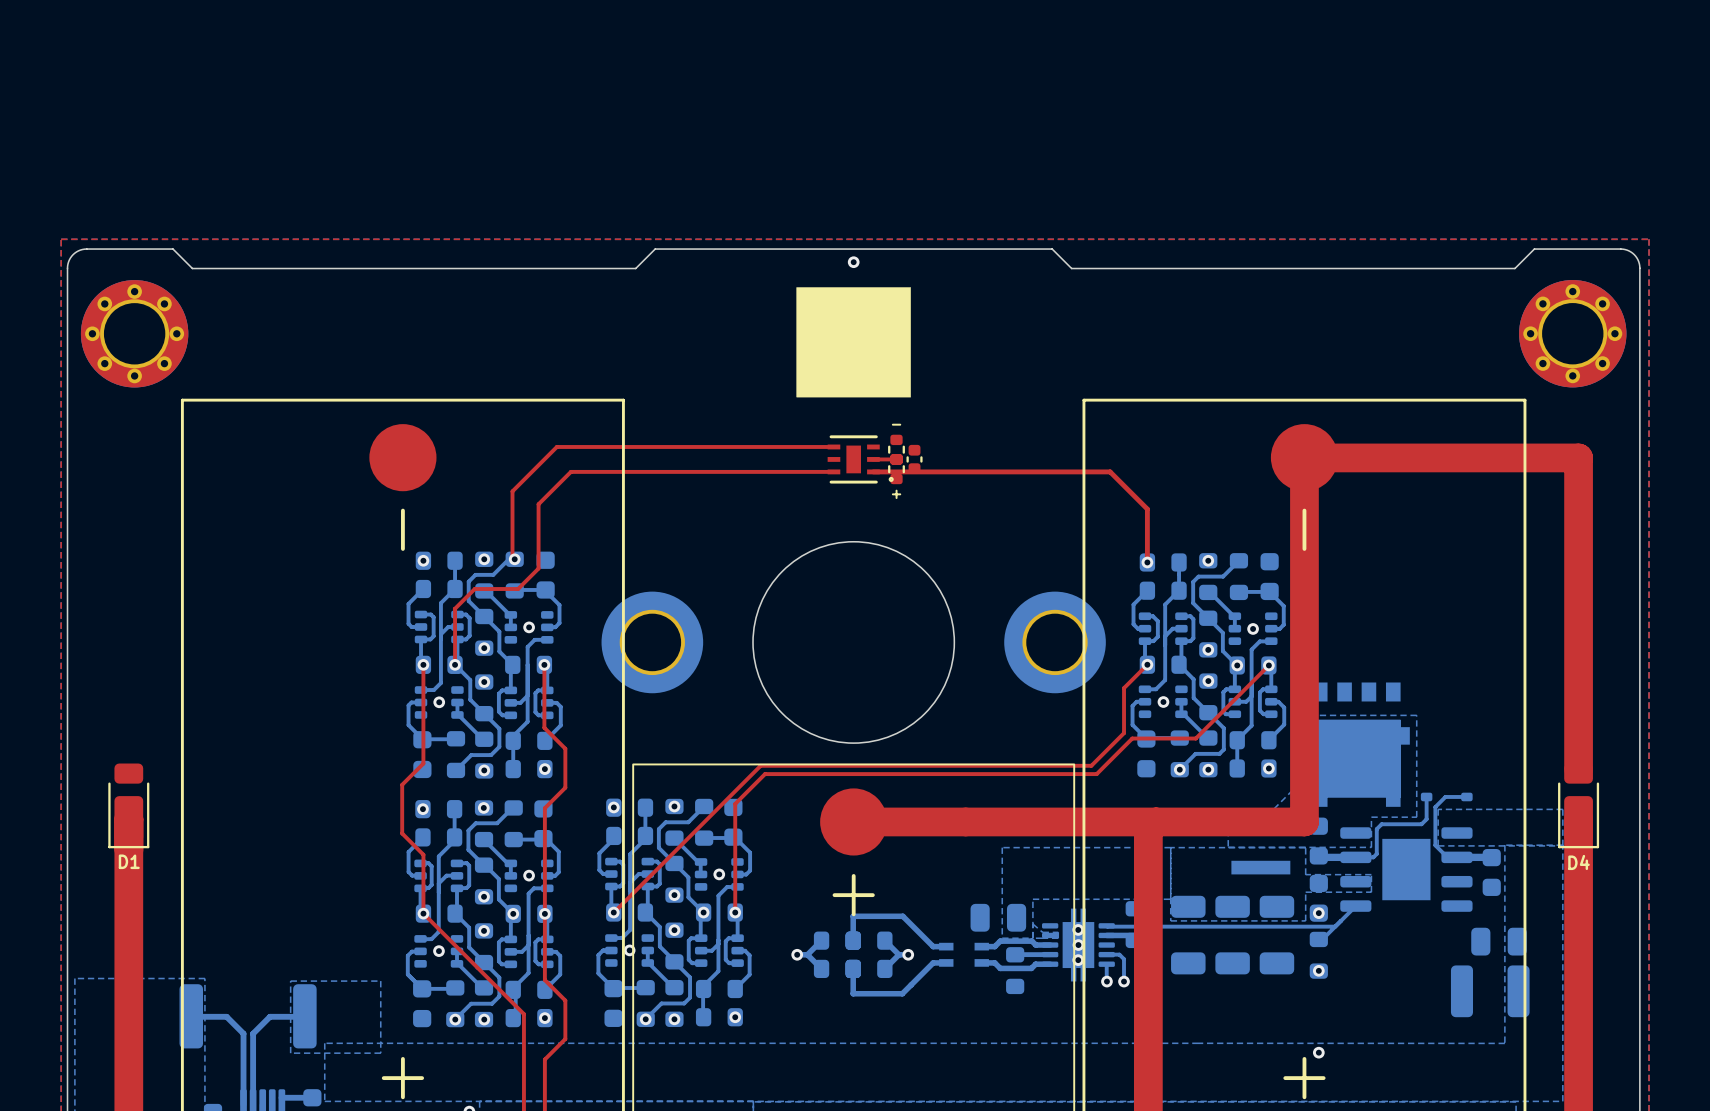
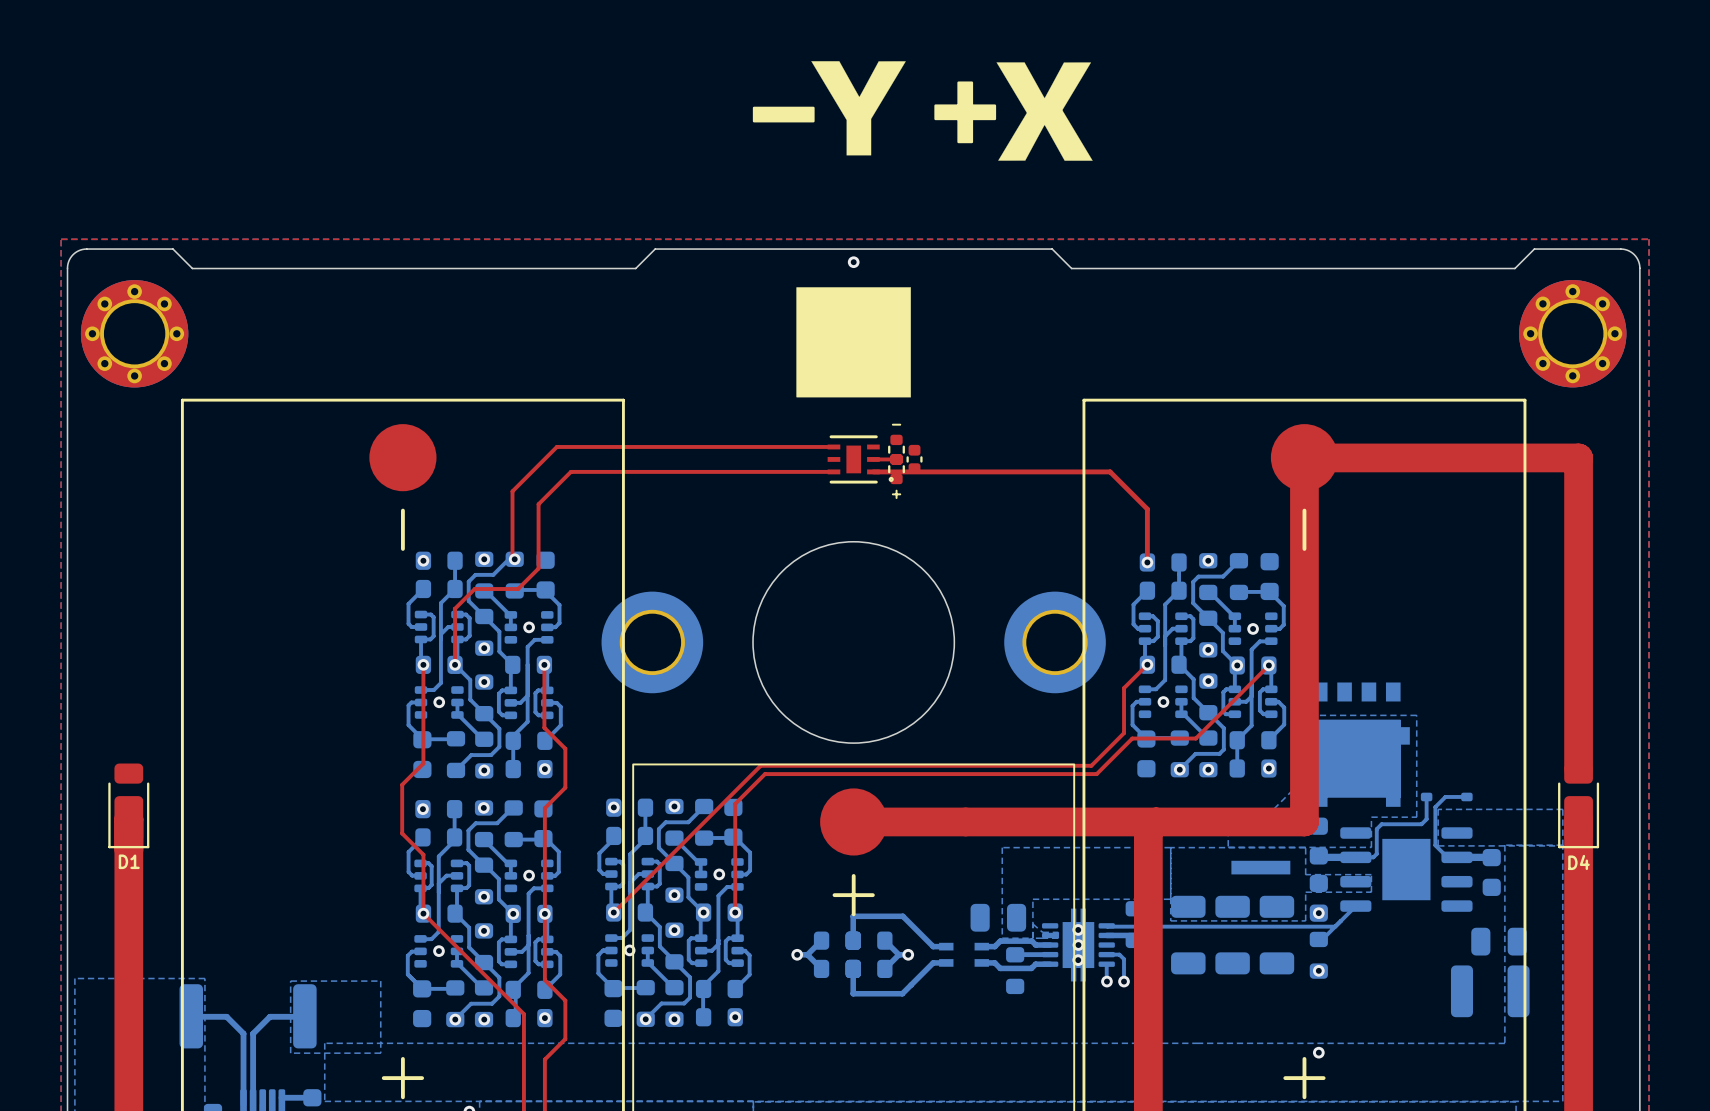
drawing: none -> [752, 61, 906, 156]
drawing: none -> [934, 62, 1093, 161]

